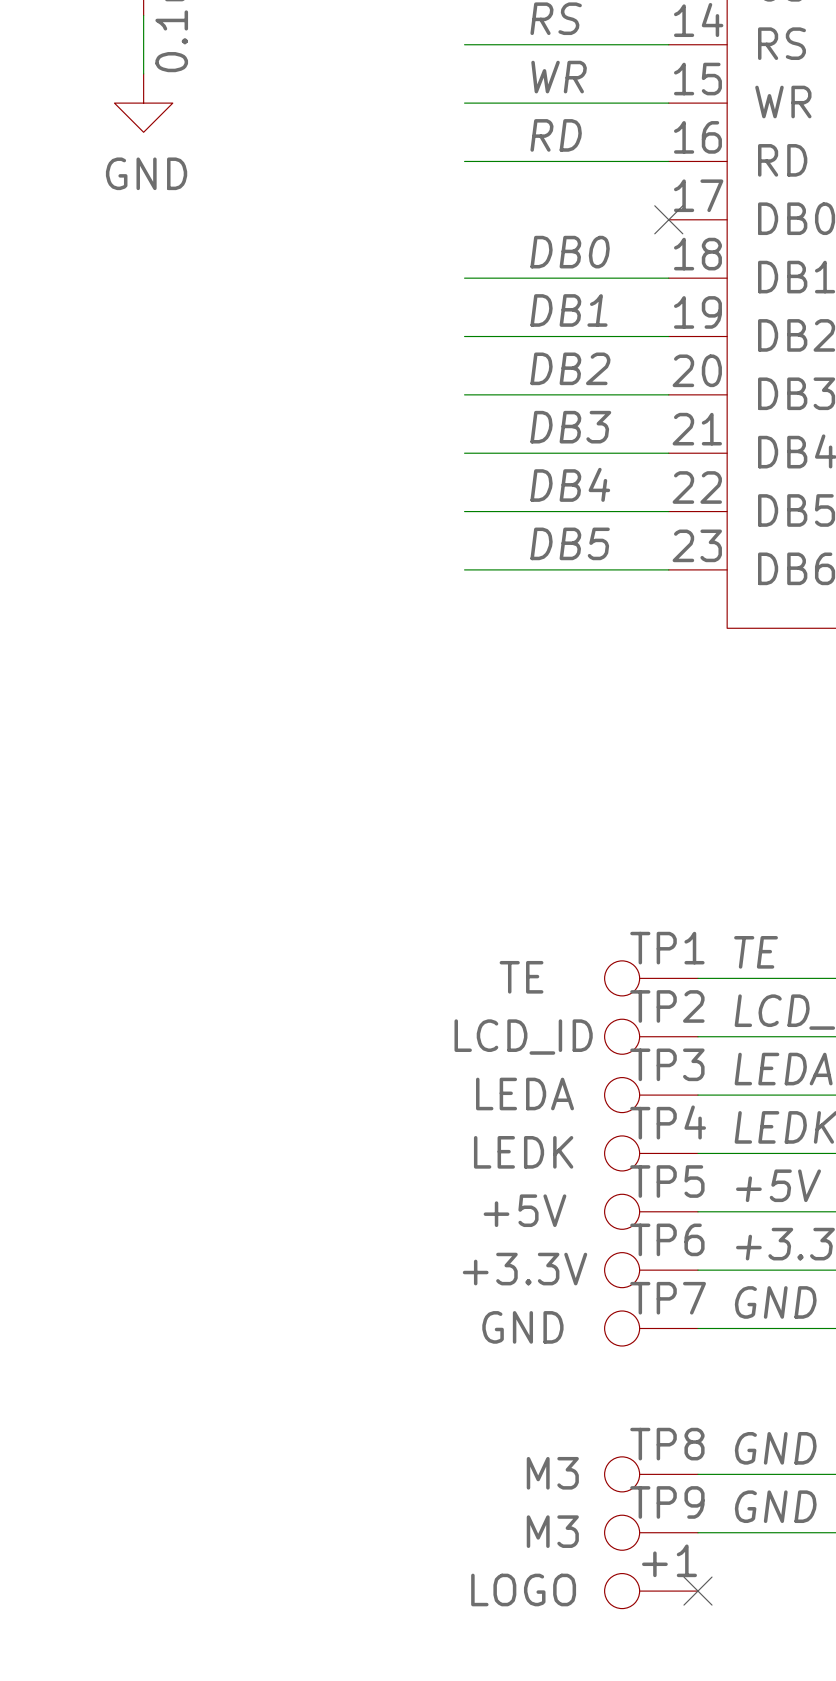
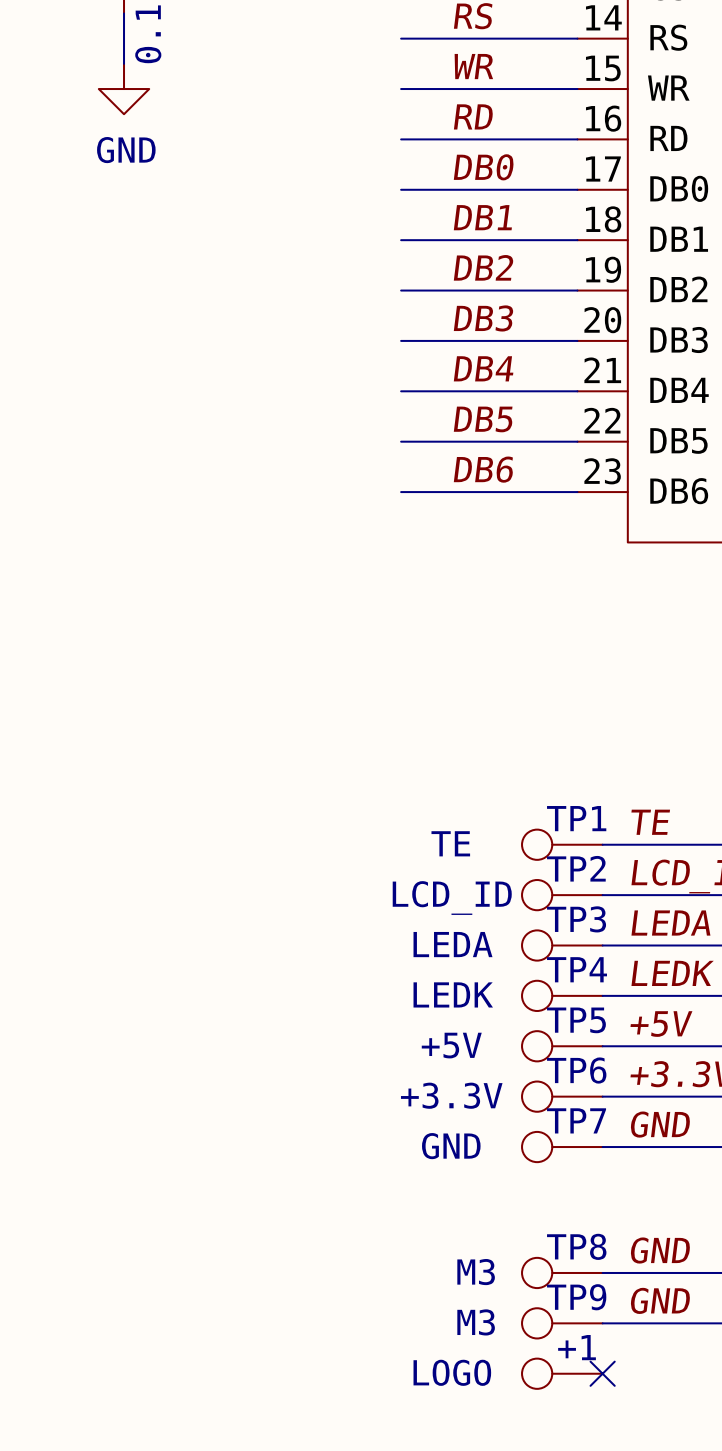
label: none -> DB0 (483, 167)
wire: none -> (401, 189) (577, 189)
no-connect mark: (668, 219) -> none
label: DB0 (570, 252) -> DB1 (482, 217)
label: DB1 (568, 310) -> DB2 (483, 267)
label: DB2 (570, 368) -> DB3 (483, 318)
label: DB3 (570, 427) -> DB4 (483, 368)
label: DB4 (570, 484) -> DB5 (483, 419)
label: DB5 (570, 543) -> DB6 (483, 469)

